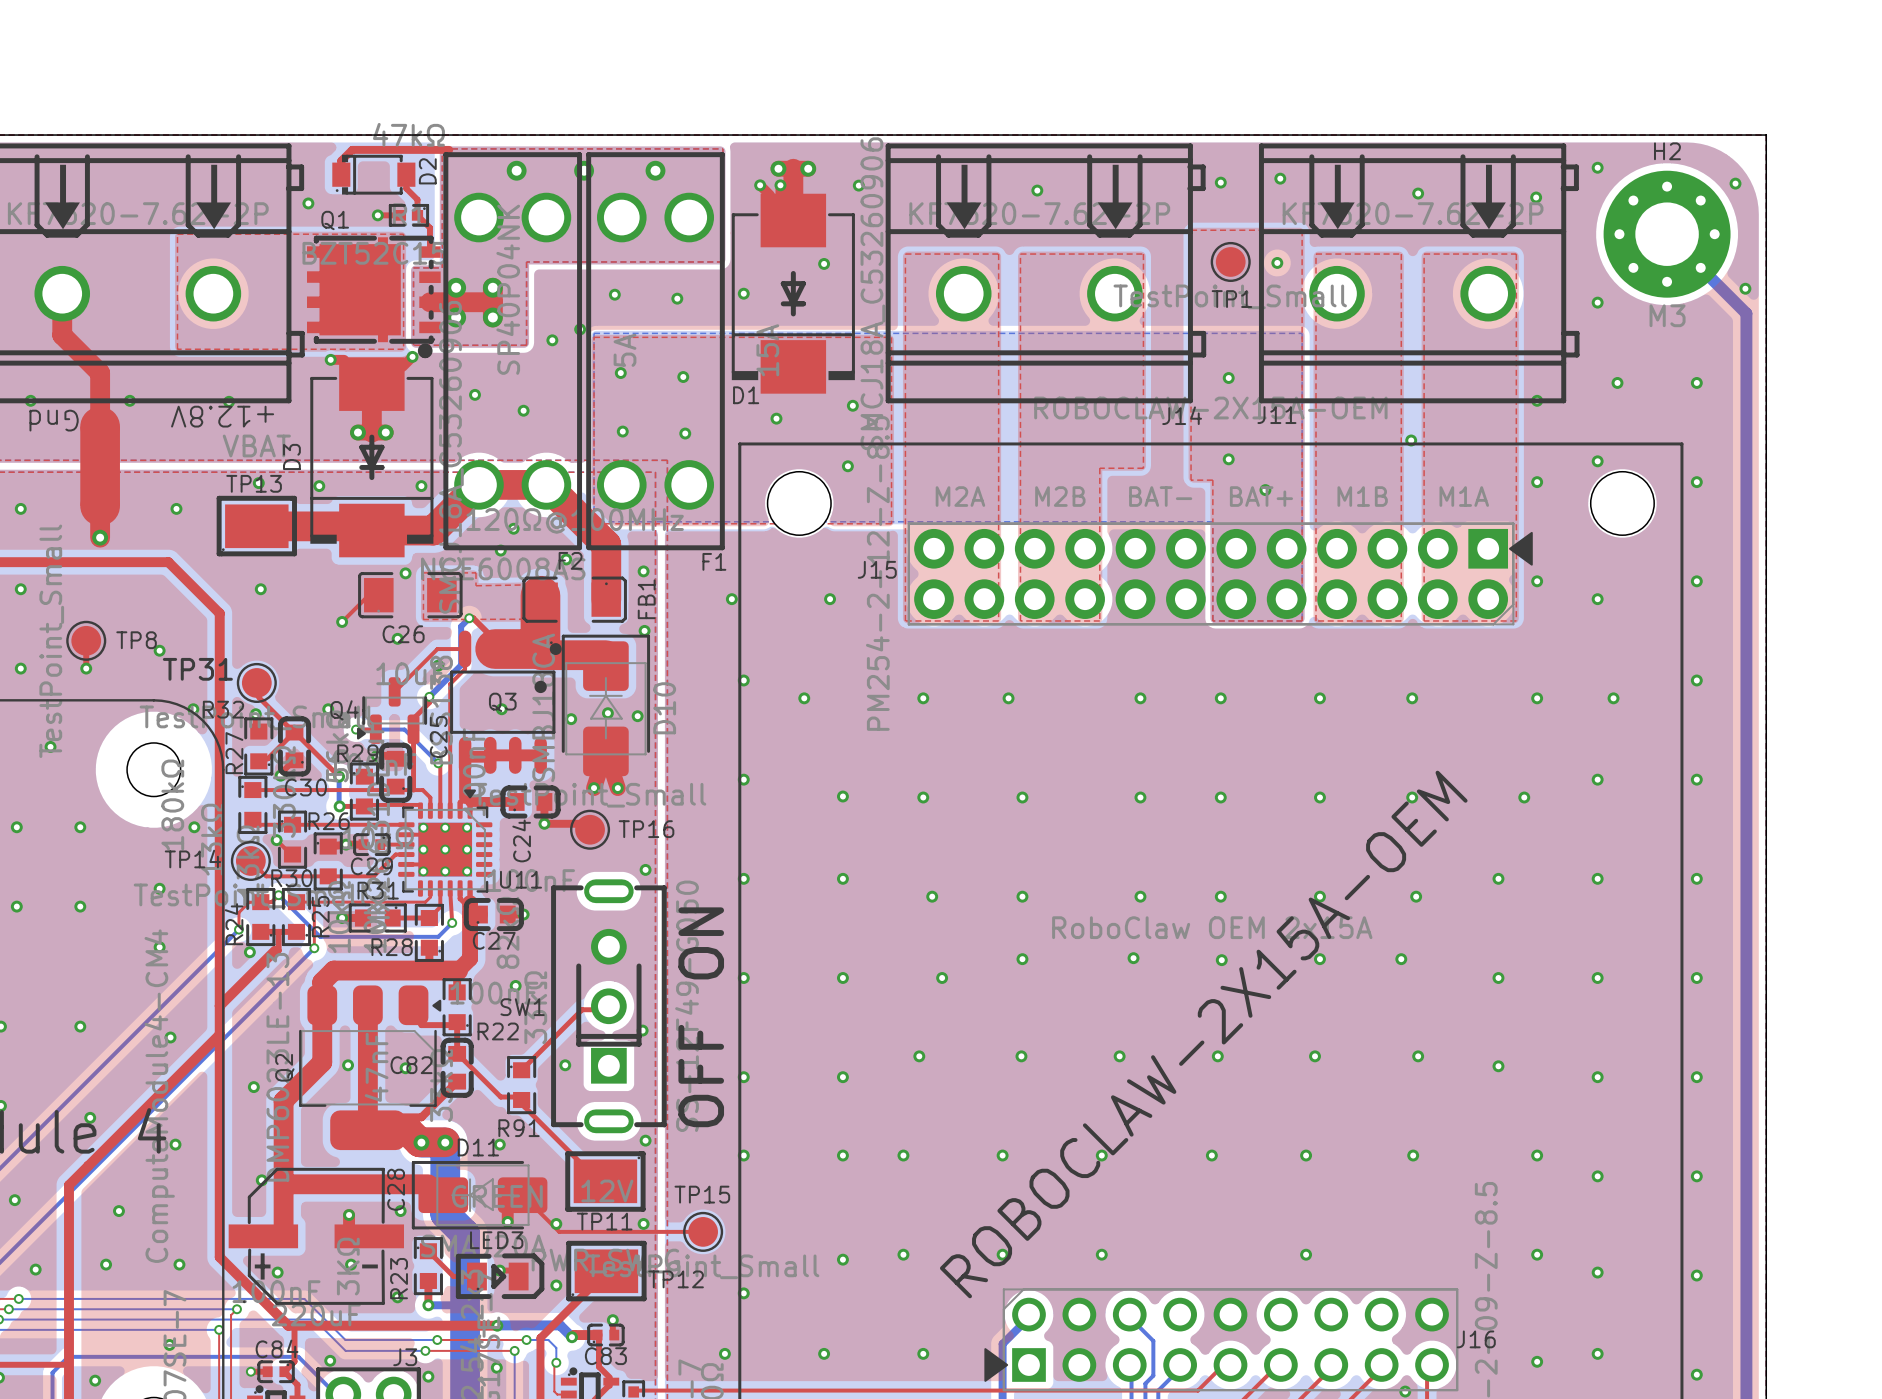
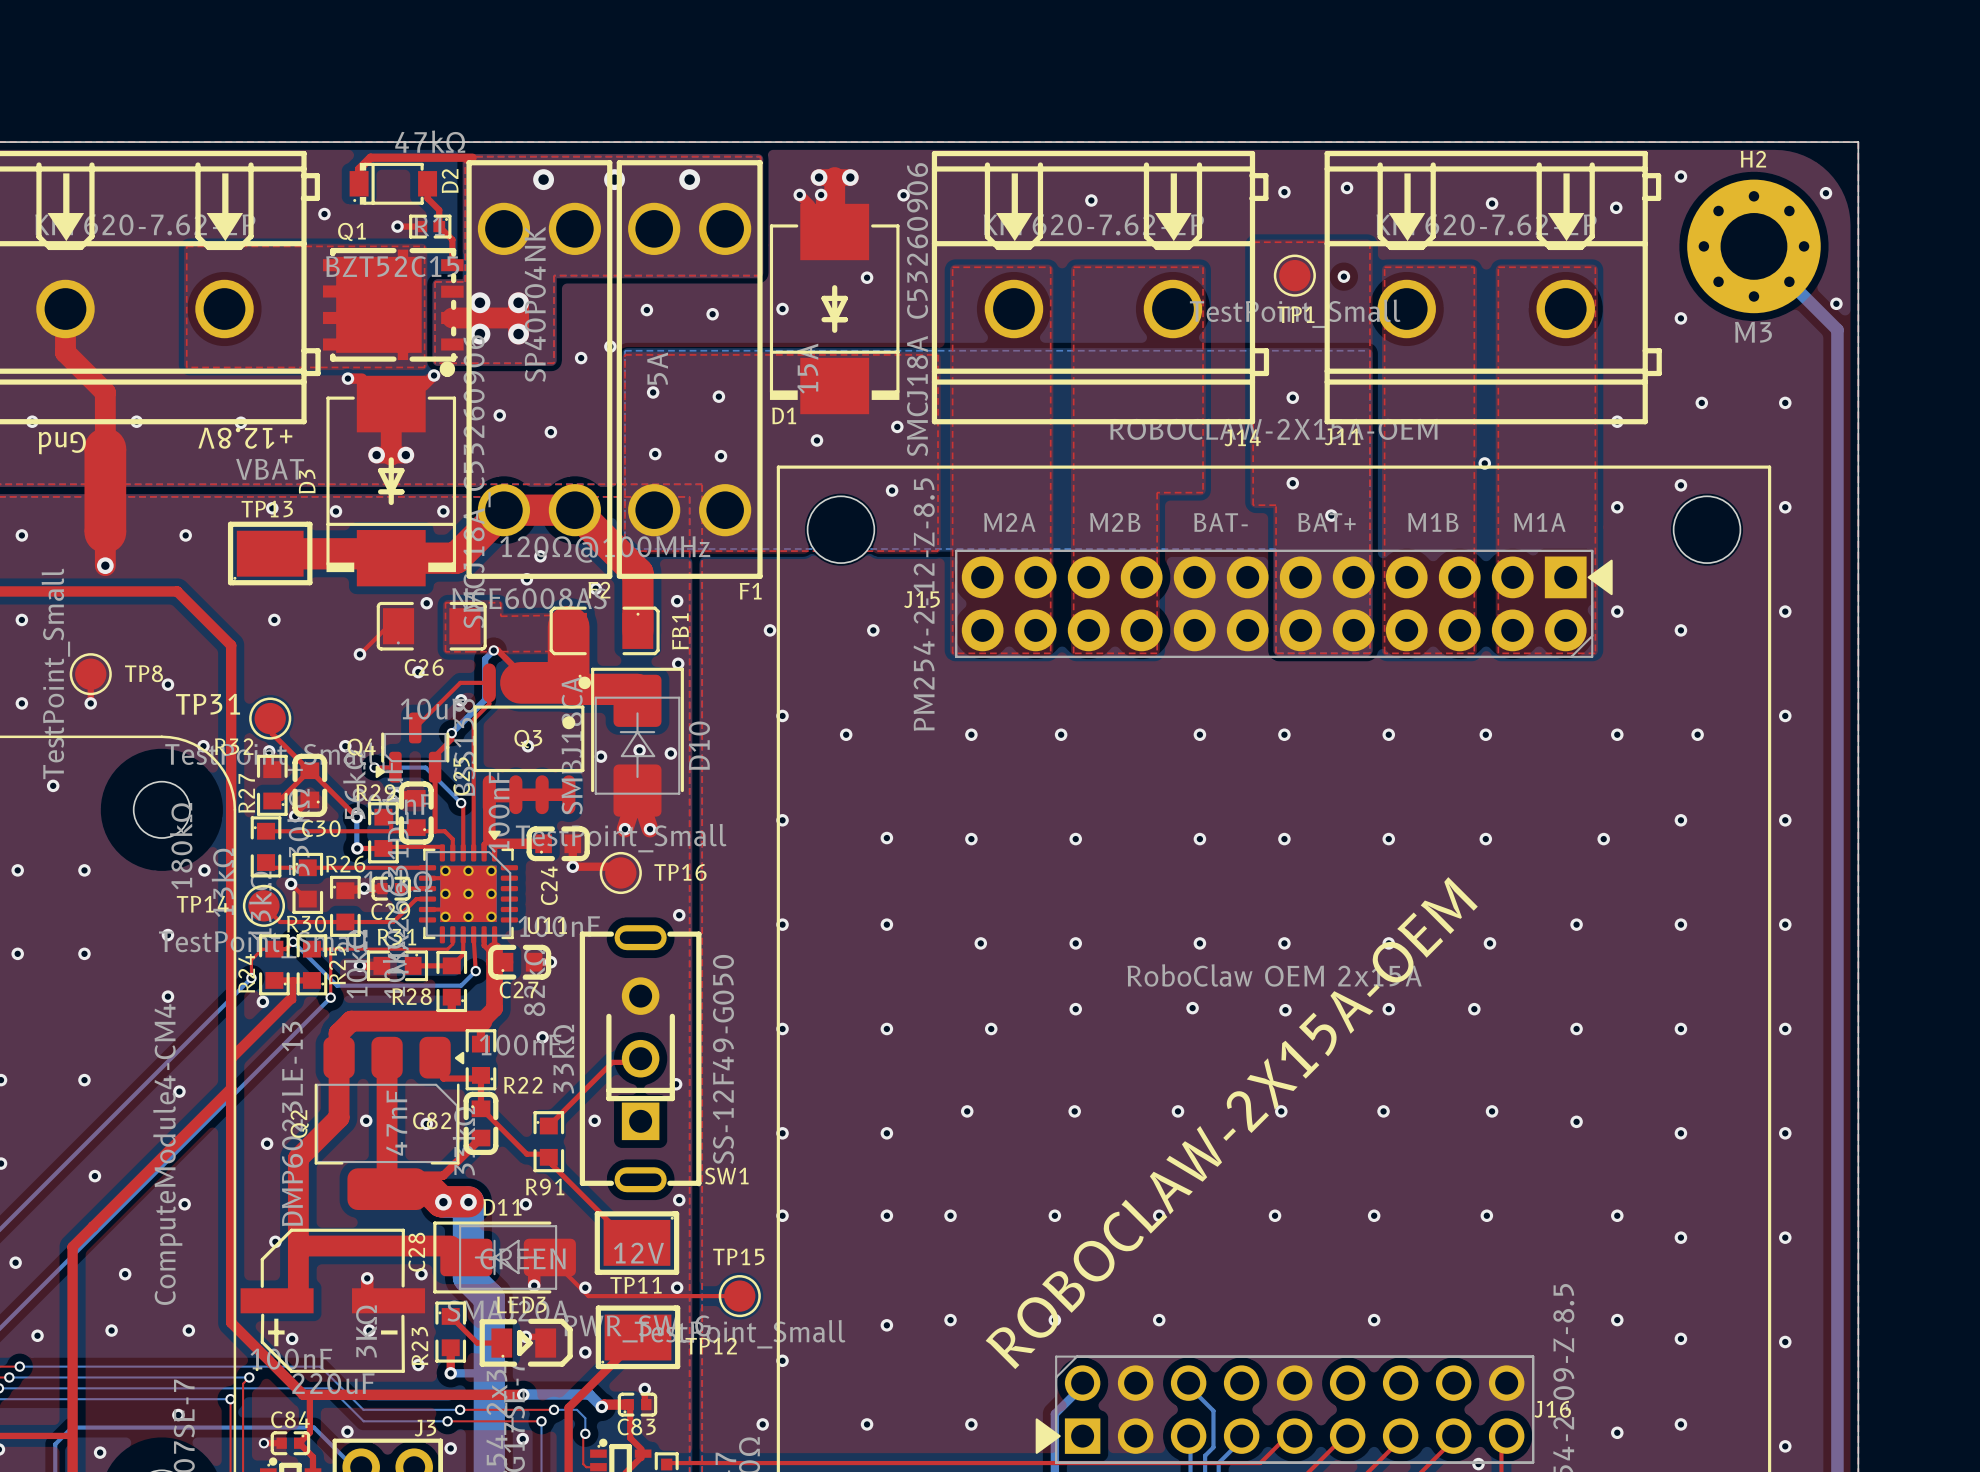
text: ON (701, 943) -> none
SW1 name position: SW1 (522, 1007) -> SW1 (726, 1176)
text: OFF (701, 1076) -> none

